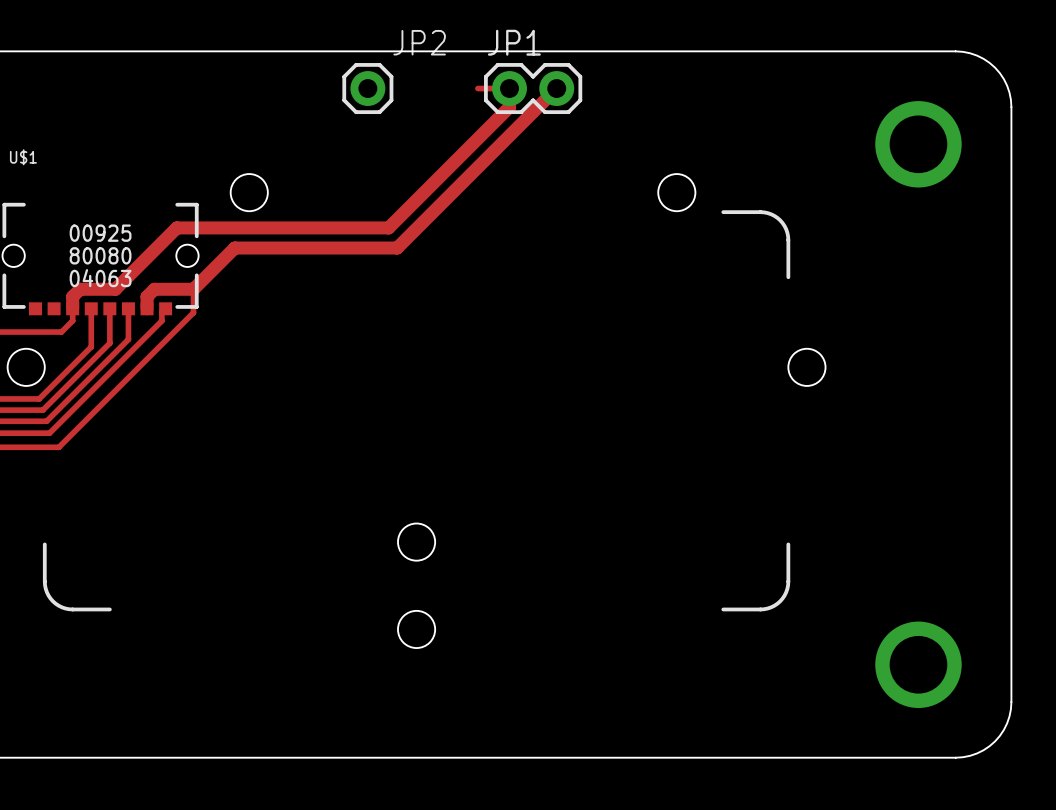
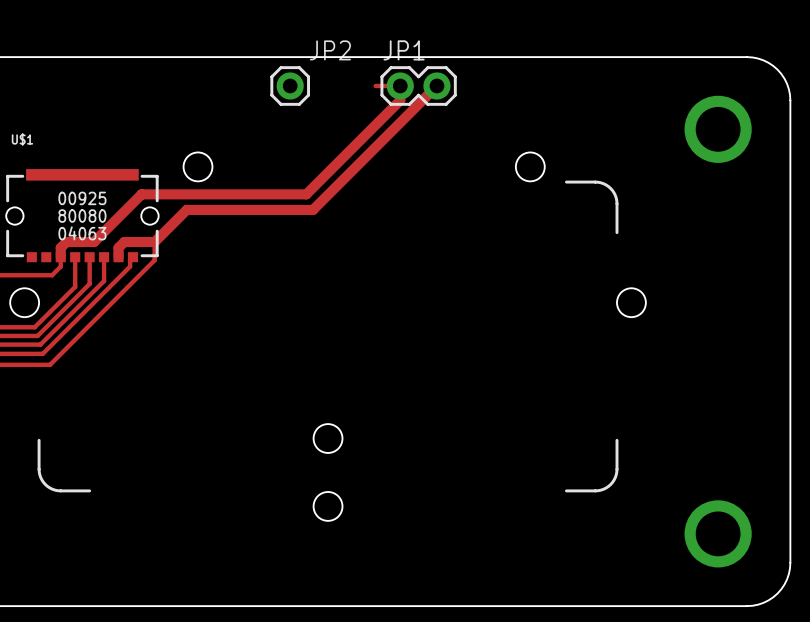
drawing: none -> [26, 169, 139, 181]

